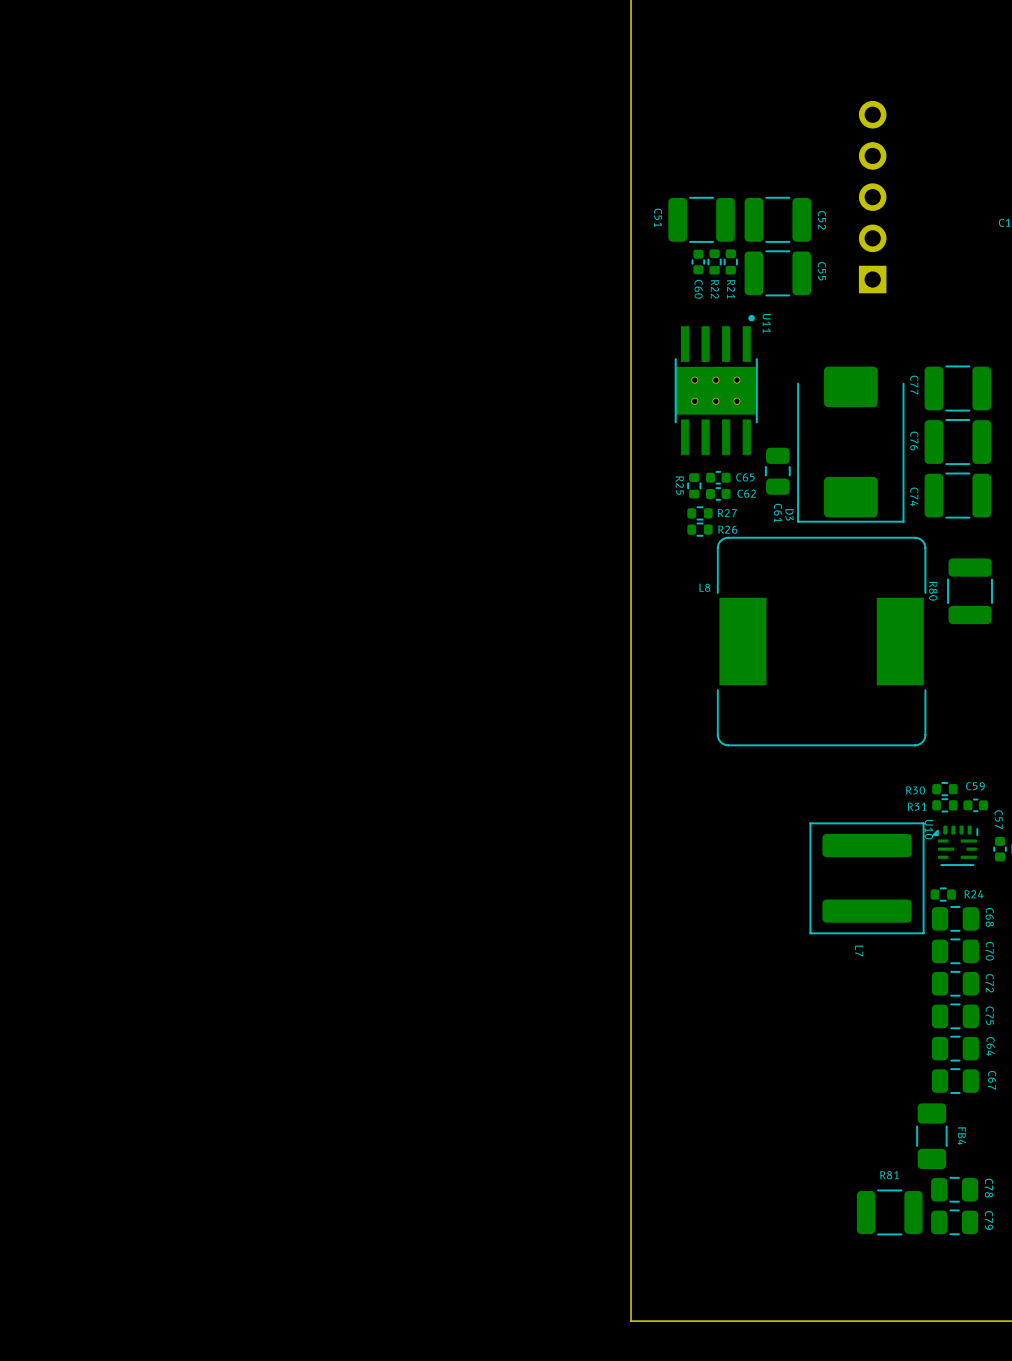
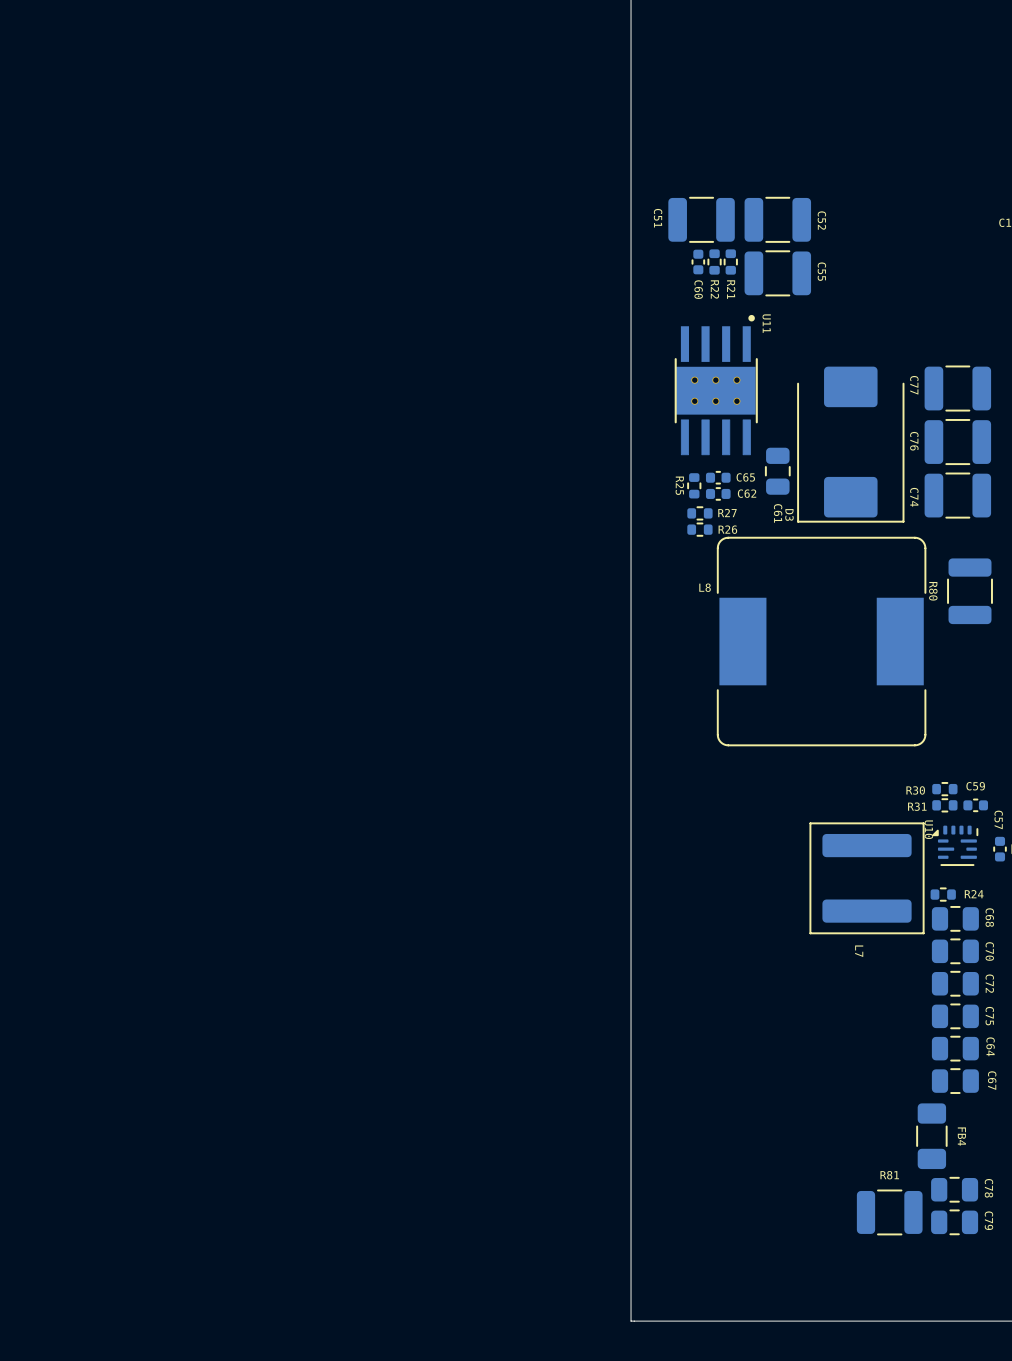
part: (872, 197) -> none

